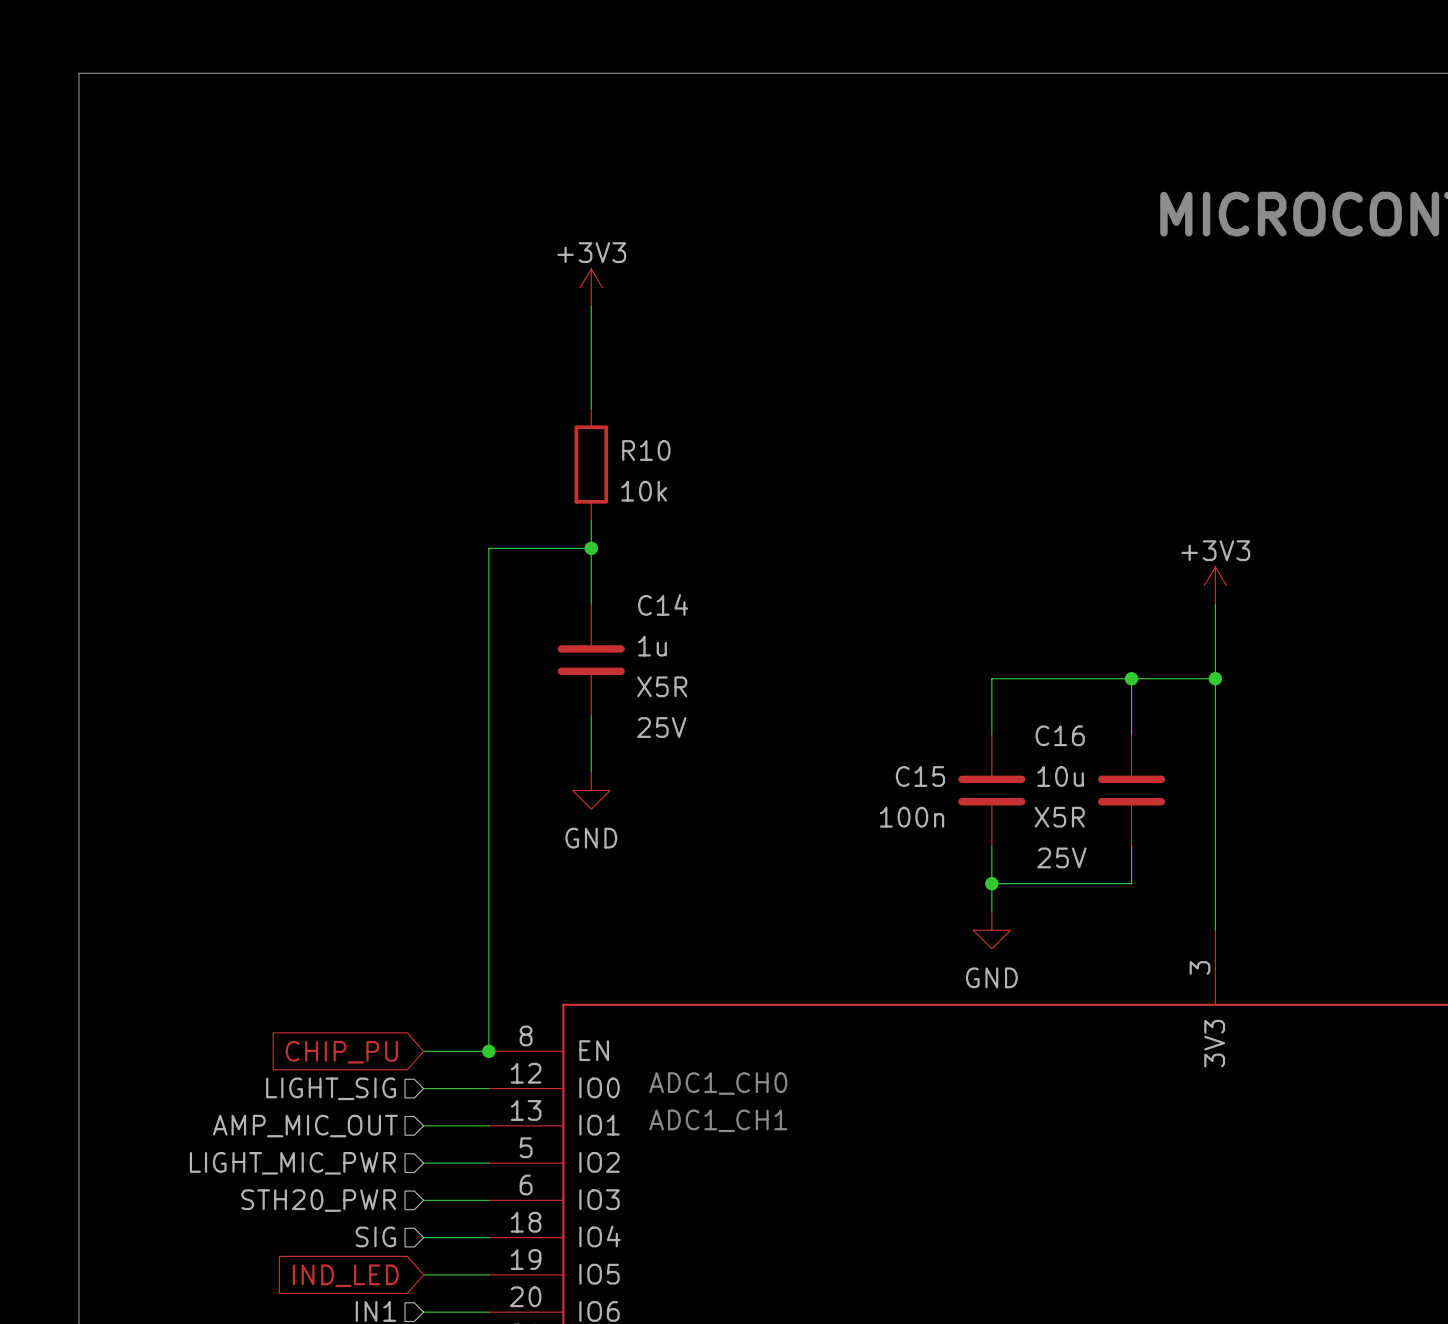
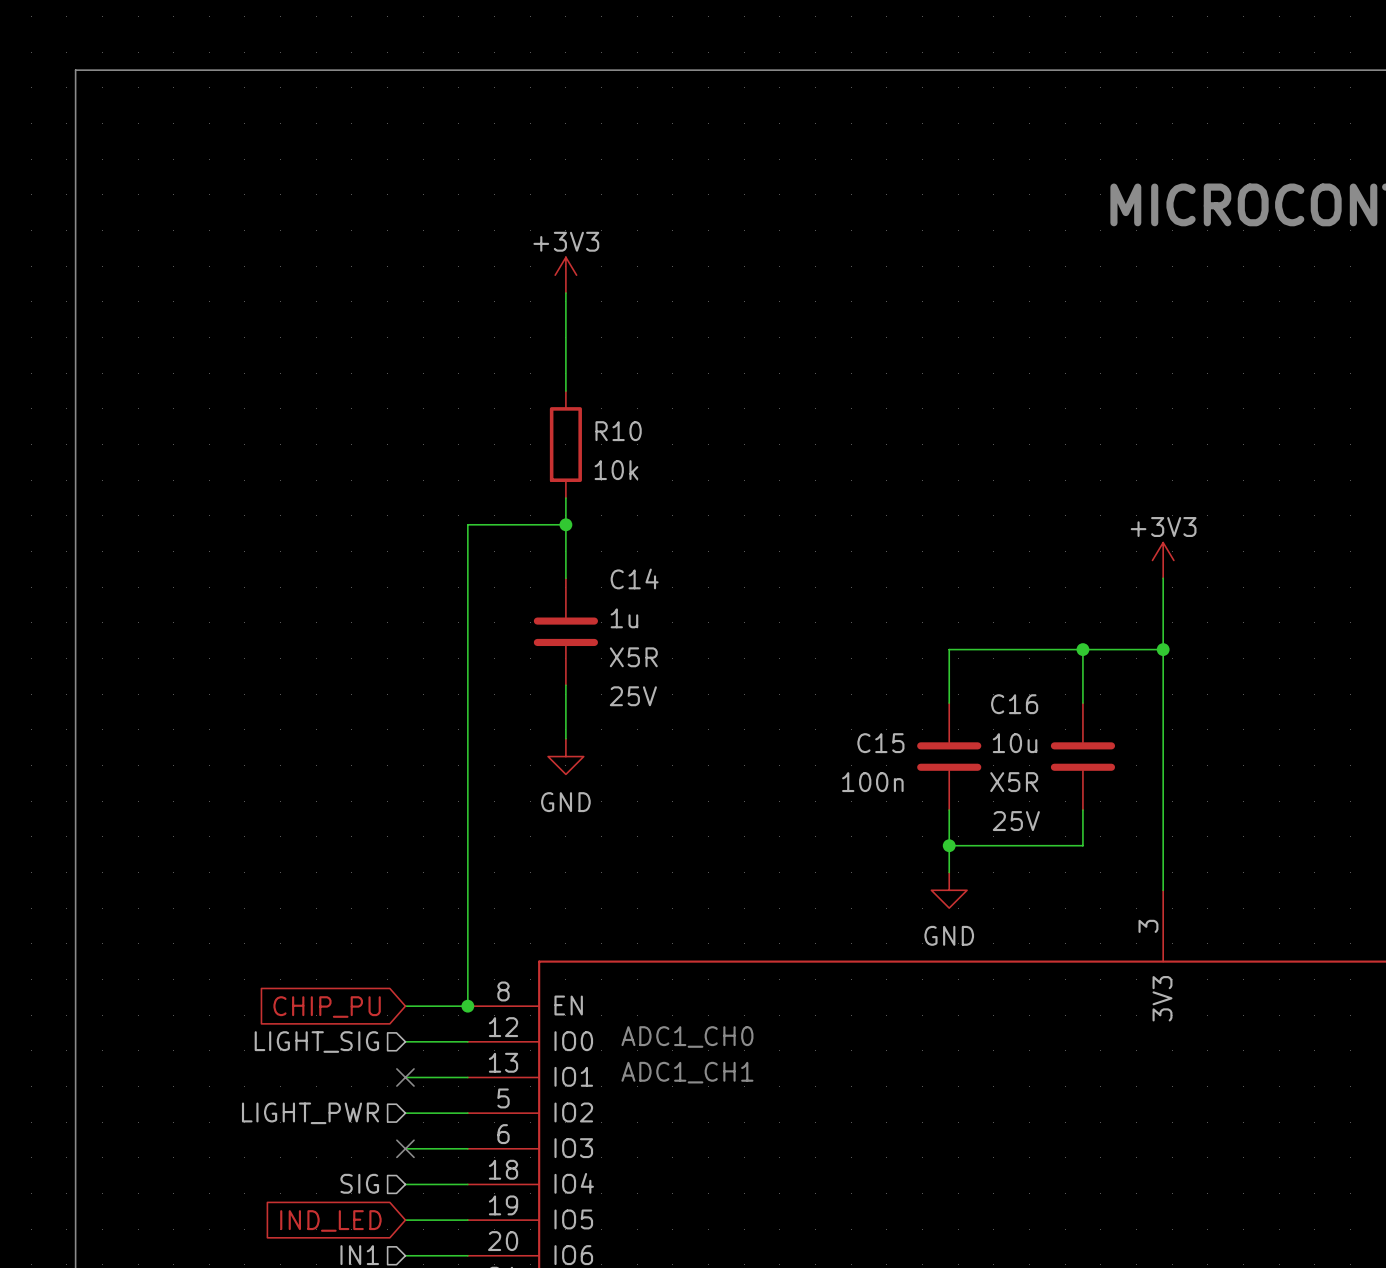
no-connect mark: none -> (405, 1077)
hierarchical label: AMP_MIC_OUT (305, 1126) -> none
hierarchical label: LIGHT_MIC_PWR (292, 1163) -> LIGHT_PWR (310, 1113)
hierarchical label: STH20_PWR (318, 1200) -> none
no-connect mark: none -> (405, 1148)

